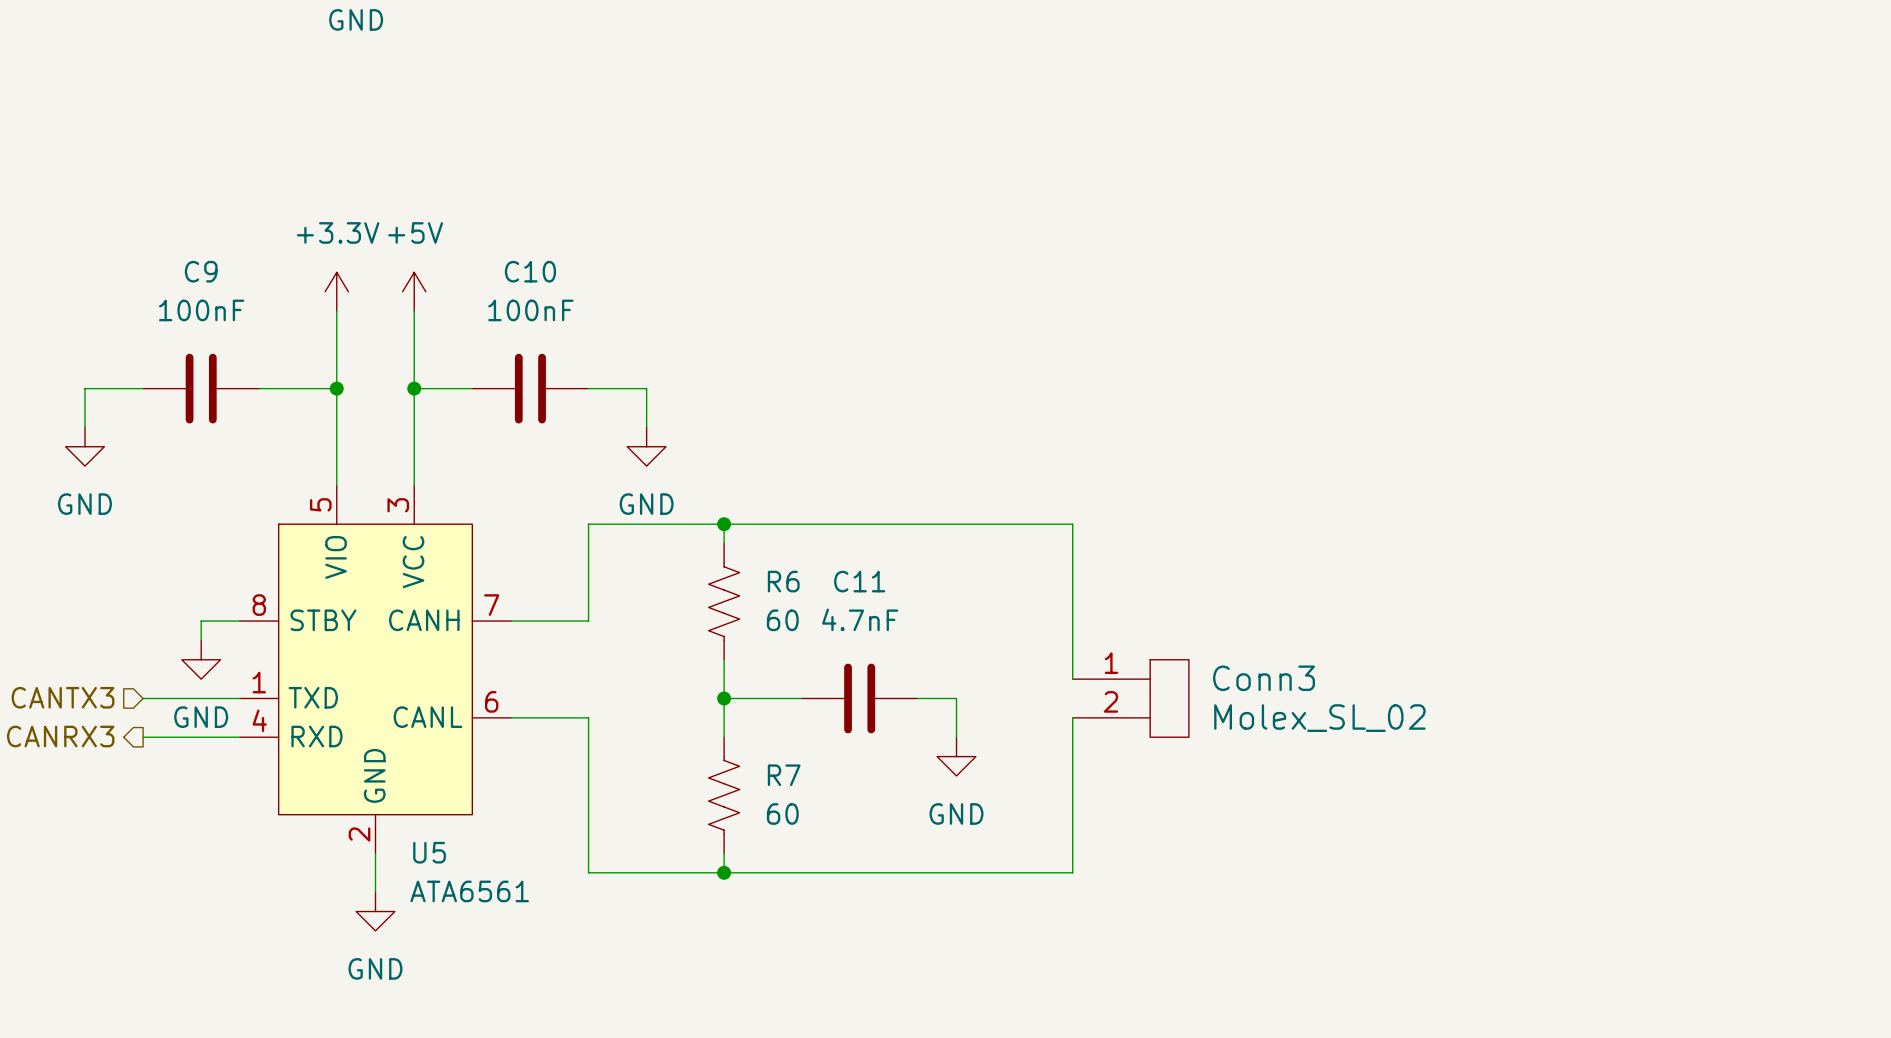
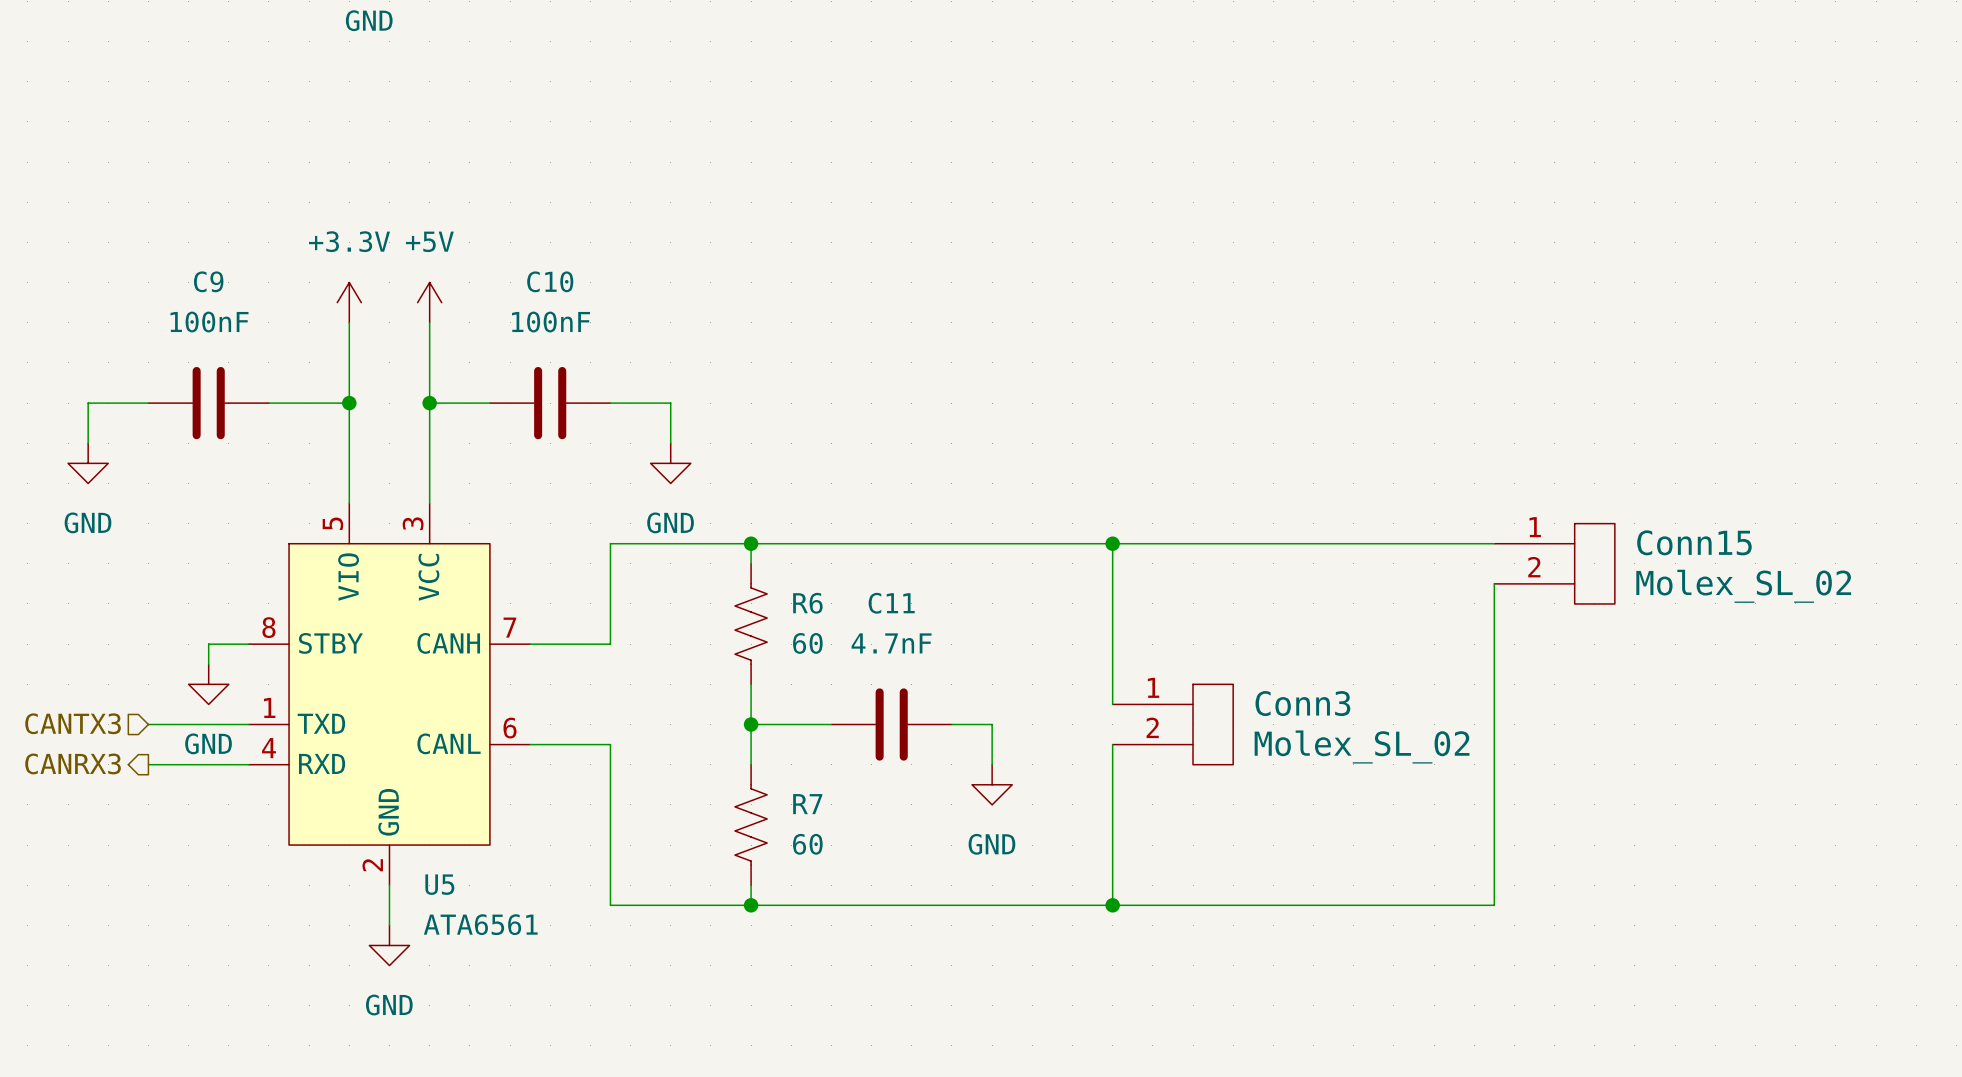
wire: none -> (1112, 543) (1494, 543)
junction: none -> (1112, 543)
Conn15: none -> Molex_SL_02 (1554, 563)
wire: none -> (1494, 583) (1494, 905) (1112, 905)
junction: none -> (1112, 905)

